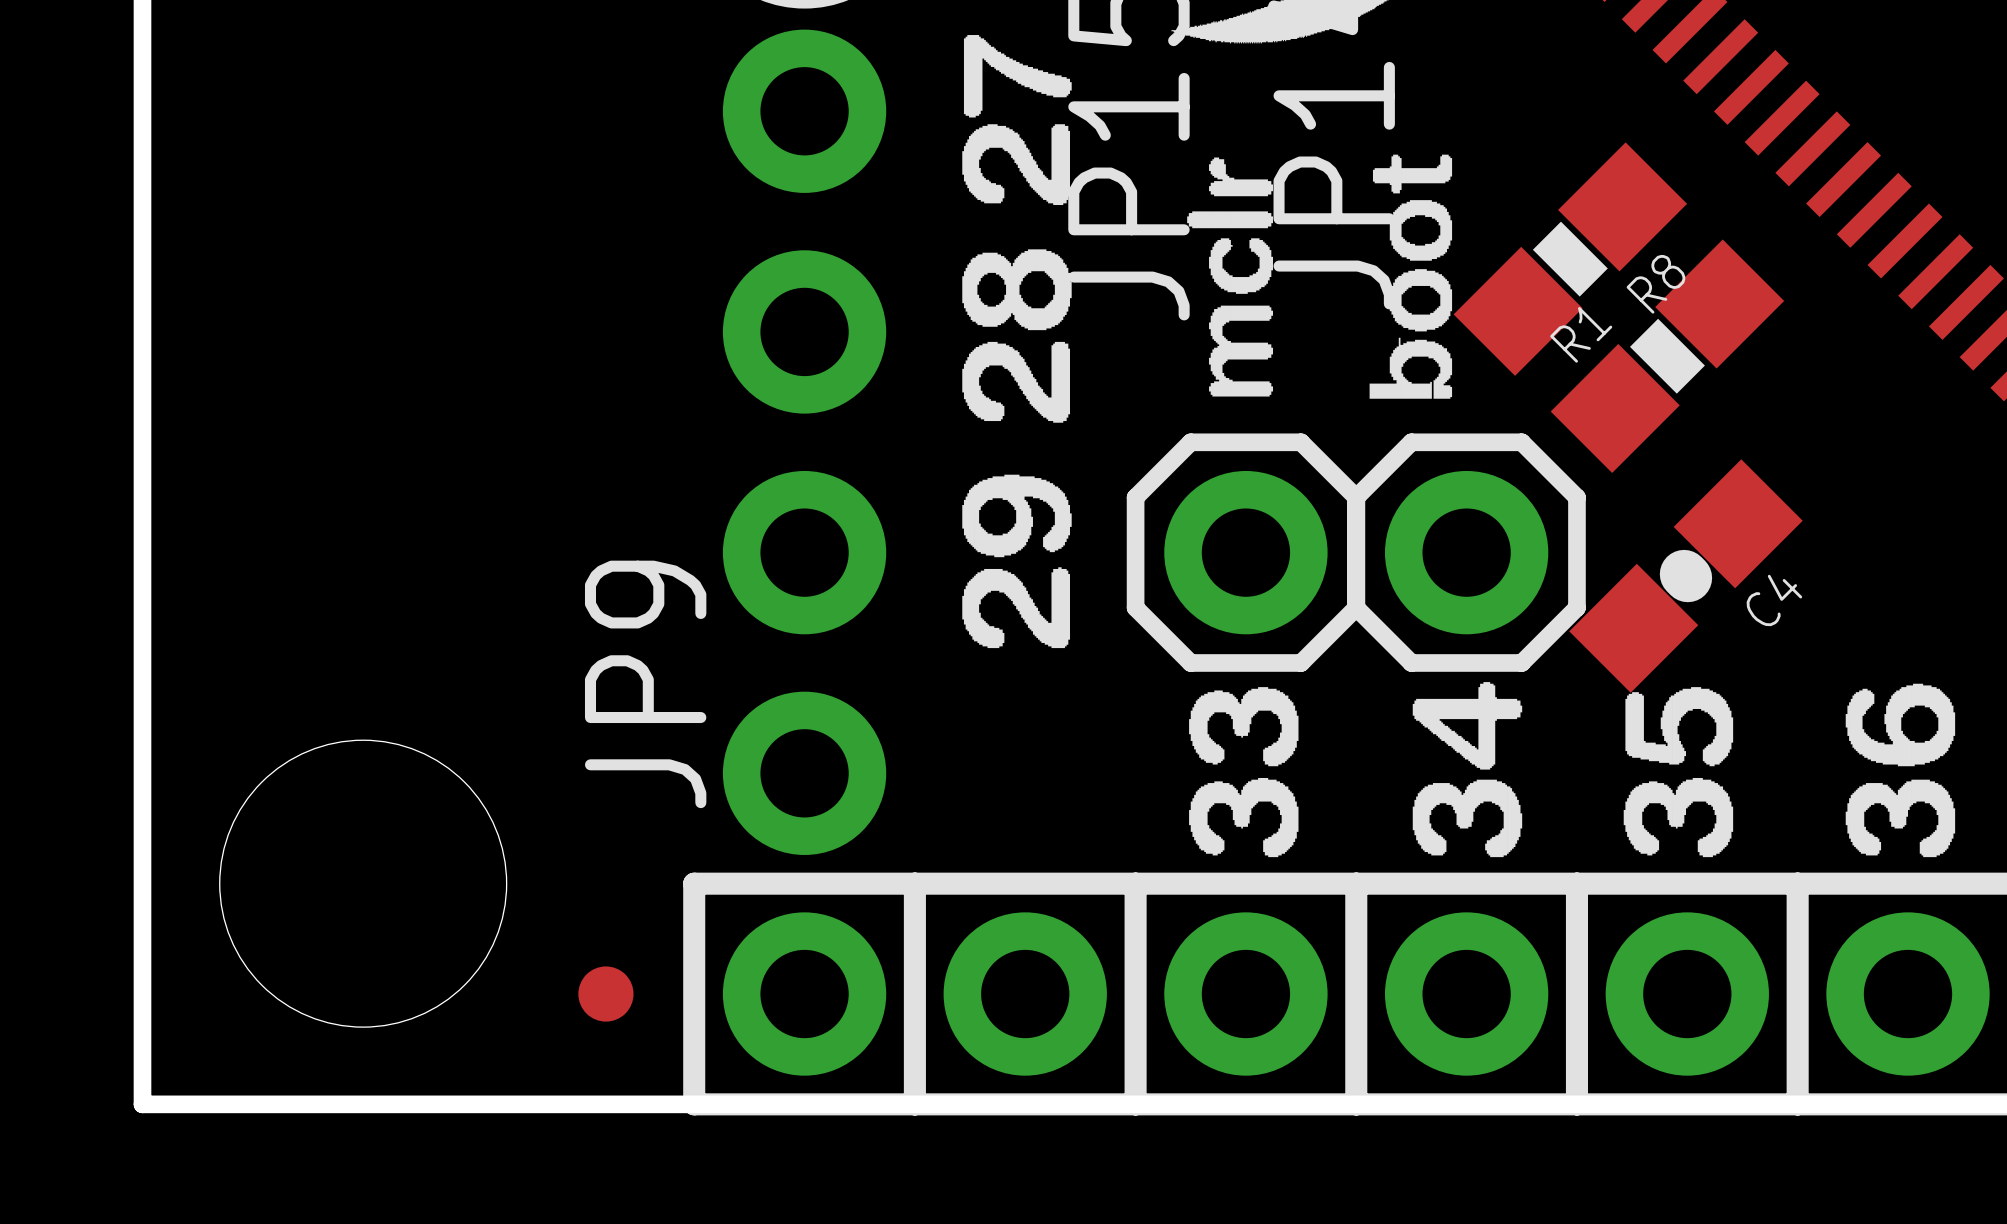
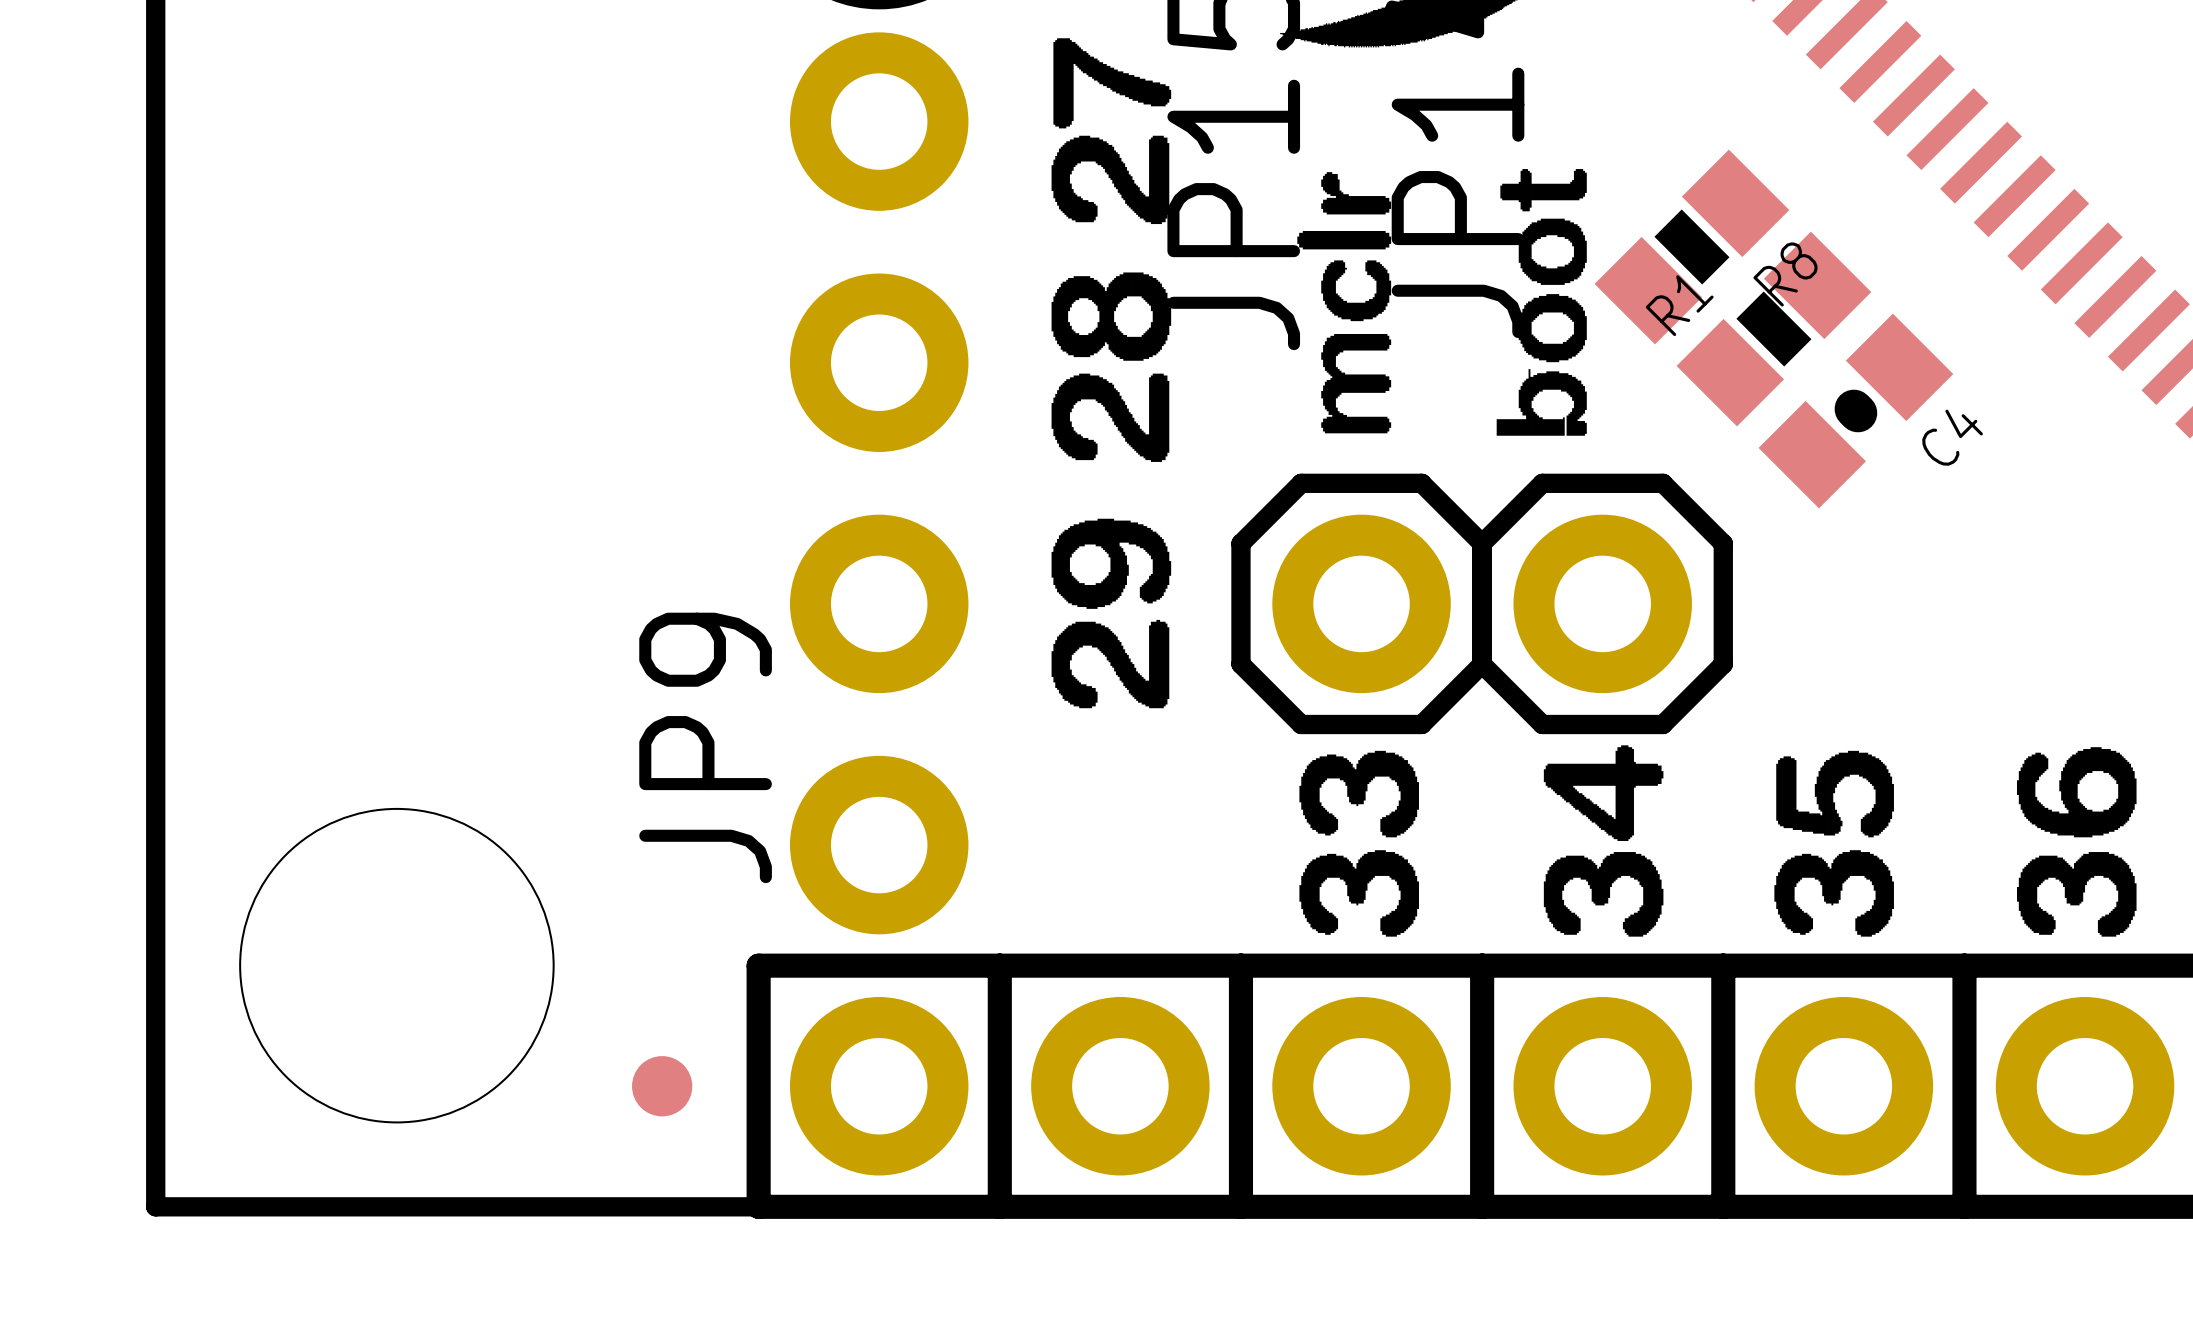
R8 footprint: [1453, 142, 1688, 376] -> [1594, 149, 1790, 345]
R1 footprint: [1550, 239, 1785, 473] -> [1676, 231, 1872, 427]
R8 name position: R8 (1655, 284) -> R8 (1785, 274)
R1 name position: R1 (1581, 334) -> R1 (1679, 305)
C4 footprint: [1569, 459, 1803, 693] -> [1758, 313, 1954, 509]

